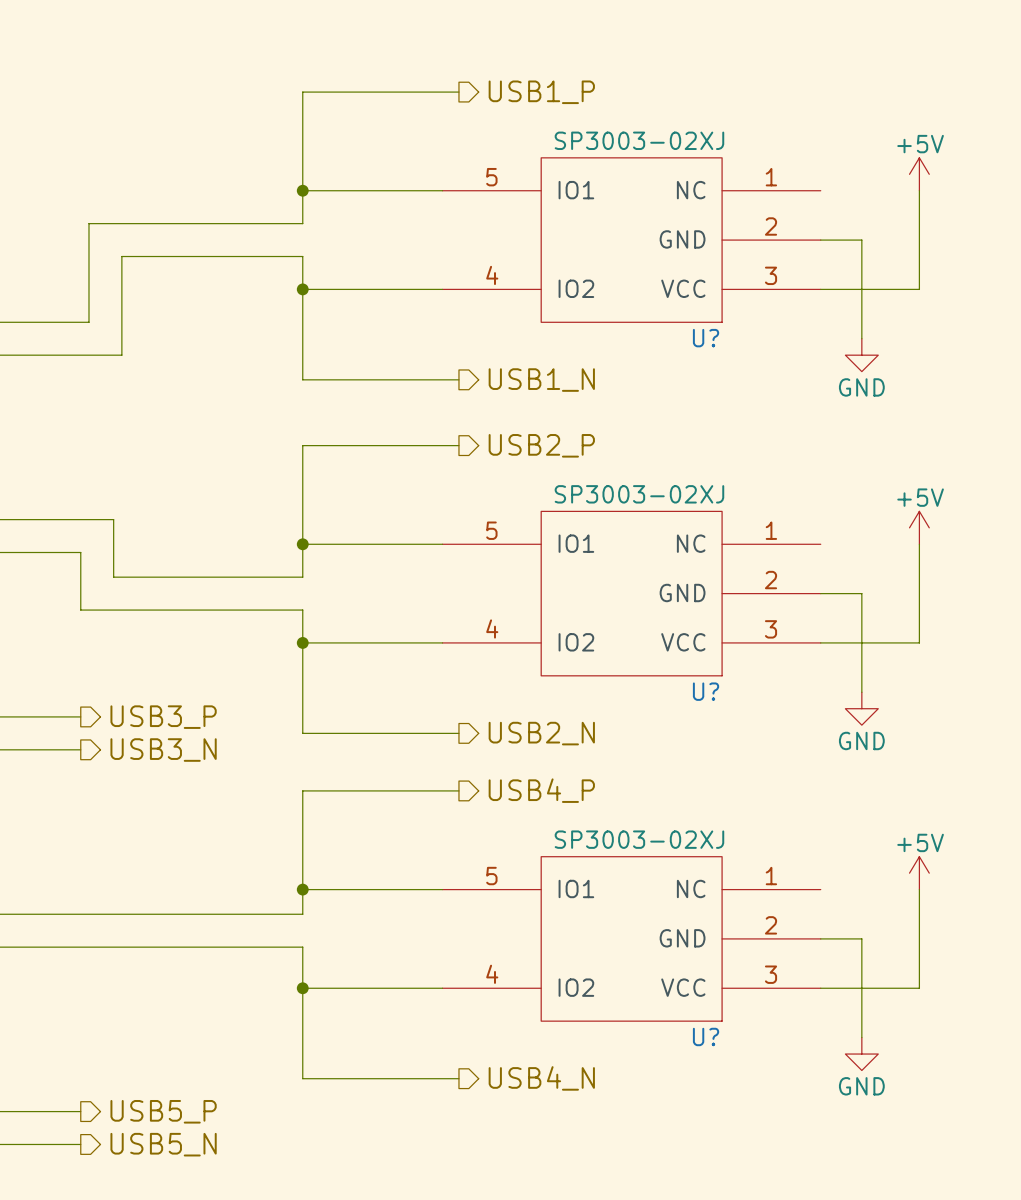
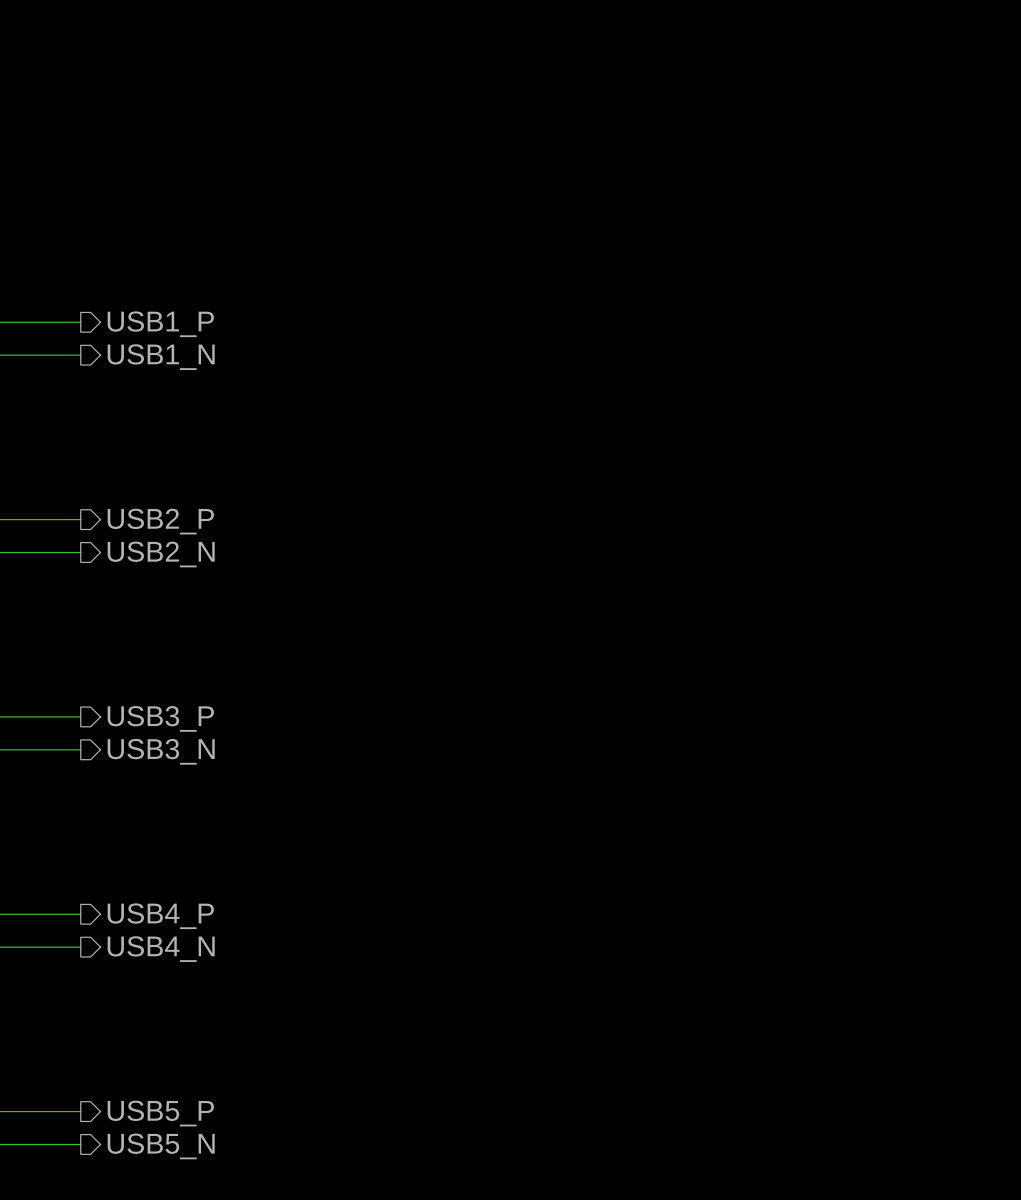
wire: (458, 92) (302, 92) (302, 223) (88, 223) (88, 322) (80, 322) -> none
hierarchical label: USB1_P (541, 92) -> none
power symbol: +5V (919, 174) -> none
wire: (302, 190) (442, 190) -> none
junction: (302, 190) -> none
wire: (919, 190) (919, 289) (820, 289) -> none
U?: SP3003-02XJ (631, 240) -> none
wire: (820, 240) (861, 240) (861, 338) -> none
wire: (302, 289) (442, 289) -> none
junction: (302, 289) -> none
hierarchical label: none -> USB1_P (160, 324)
wire: (80, 355) (121, 355) (121, 256) (302, 256) (302, 379) (458, 379) -> none
hierarchical label: none -> USB1_N (161, 357)
power symbol: GND (861, 355) -> none
hierarchical label: USB1_N (541, 380) -> none
wire: (458, 445) (302, 445) (302, 577) (113, 577) (113, 519) (80, 519) -> none
hierarchical label: USB2_P (541, 445) -> none
hierarchical label: none -> USB2_P (160, 521)
power symbol: +5V (919, 527) -> none
wire: (302, 544) (442, 544) -> none
junction: (302, 544) -> none
wire: (919, 544) (919, 642) (820, 642) -> none
wire: (80, 552) (80, 610) (302, 610) (302, 733) (458, 733) -> none
hierarchical label: none -> USB2_N (161, 554)
U?: SP3003-02XJ (631, 593) -> none
wire: (820, 593) (861, 593) (861, 692) -> none
wire: (302, 642) (442, 642) -> none
junction: (302, 642) -> none
power symbol: GND (861, 708) -> none
hierarchical label: USB2_N (541, 733) -> none
wire: (458, 790) (302, 790) (302, 914) (80, 914) -> none
hierarchical label: USB4_P (541, 790) -> none
power symbol: +5V (919, 873) -> none
wire: (302, 889) (442, 889) -> none
junction: (302, 889) -> none
wire: (919, 889) (919, 988) (820, 988) -> none
hierarchical label: none -> USB4_P (160, 916)
U?: SP3003-02XJ (631, 938) -> none
wire: (820, 938) (861, 938) (861, 1037) -> none
hierarchical label: none -> USB4_N (161, 949)
wire: (80, 947) (302, 947) (302, 1078) (458, 1078) -> none
wire: (302, 988) (442, 988) -> none
junction: (302, 988) -> none
power symbol: GND (861, 1054) -> none
hierarchical label: USB4_N (541, 1078) -> none

